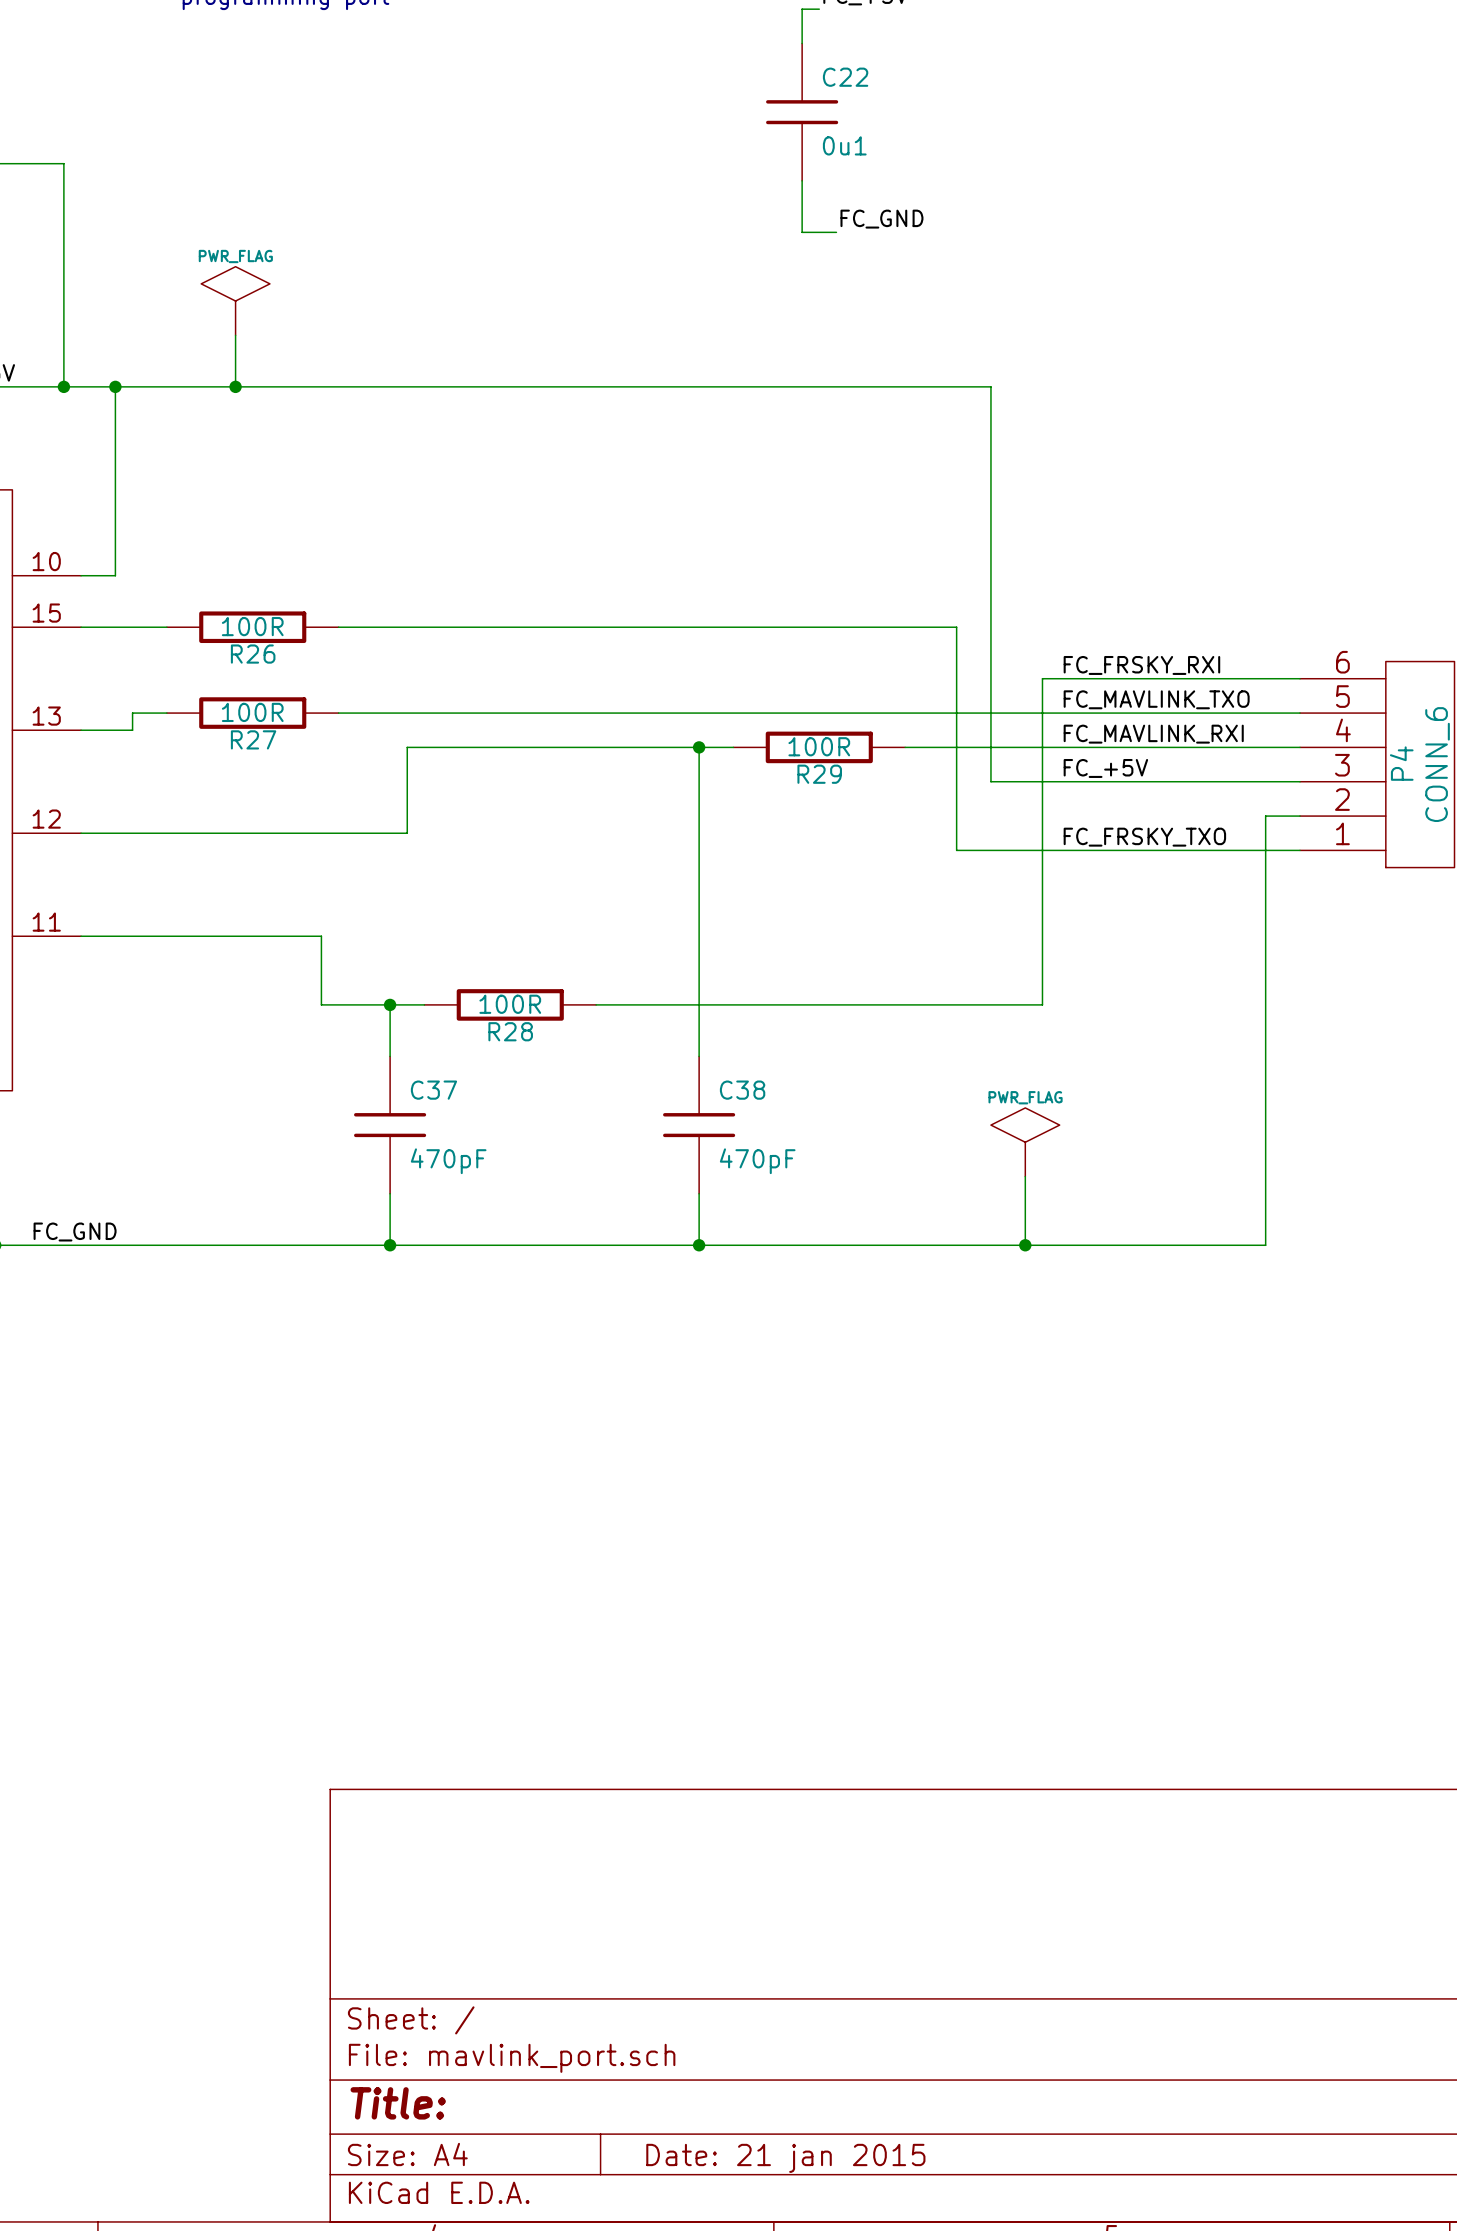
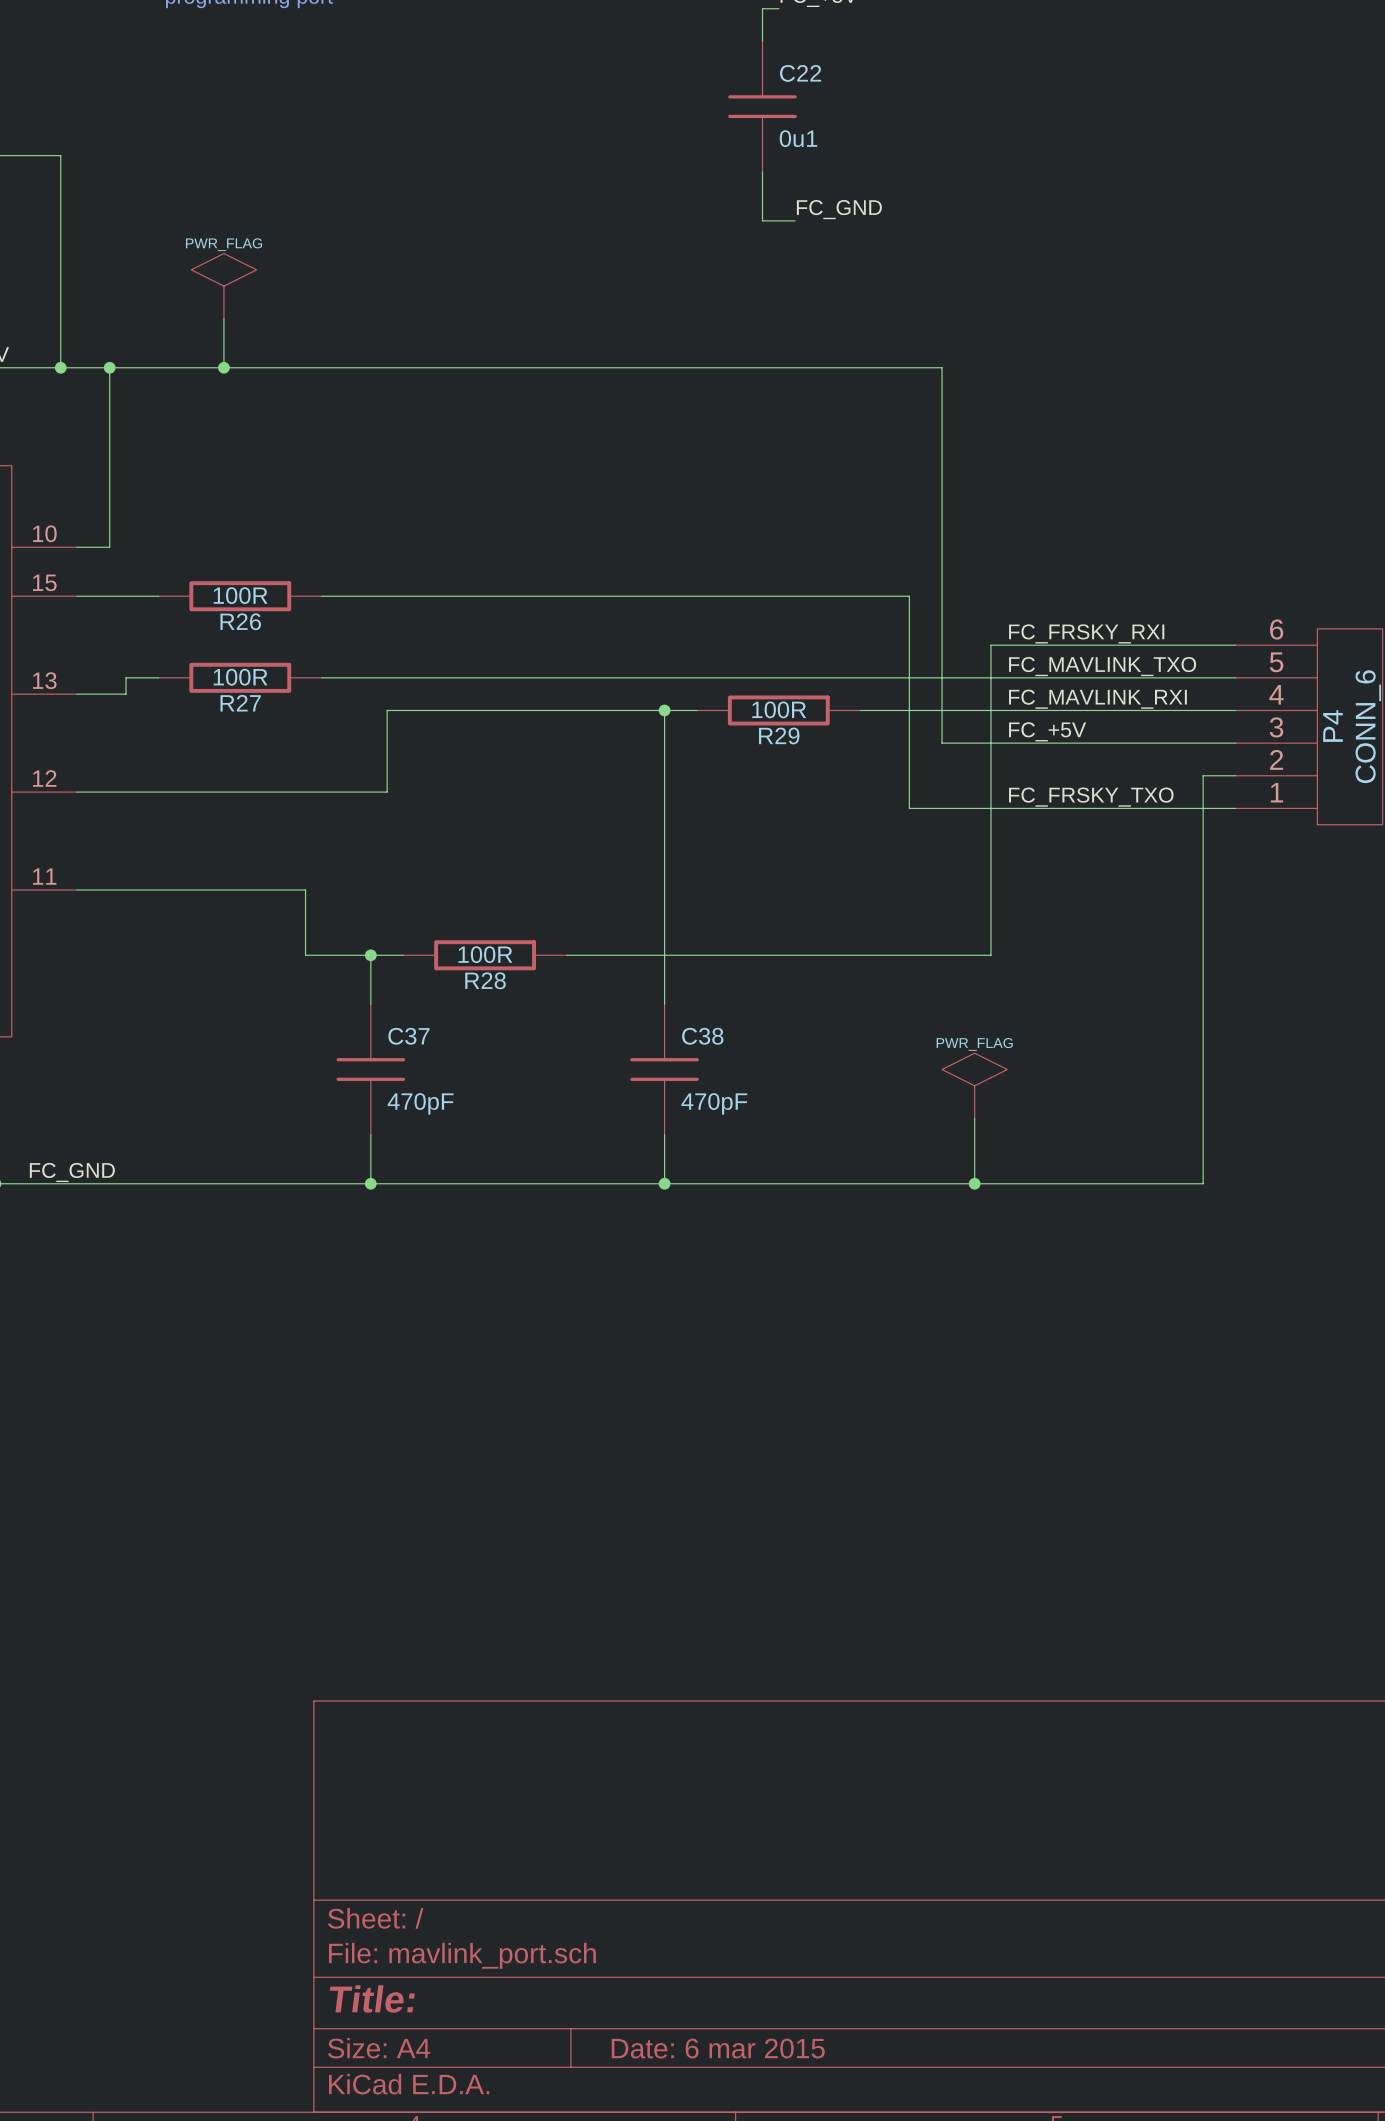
title block: Date: 21 jan 2015 (785, 2158) -> Date: 6 mar 2015 (718, 2048)

